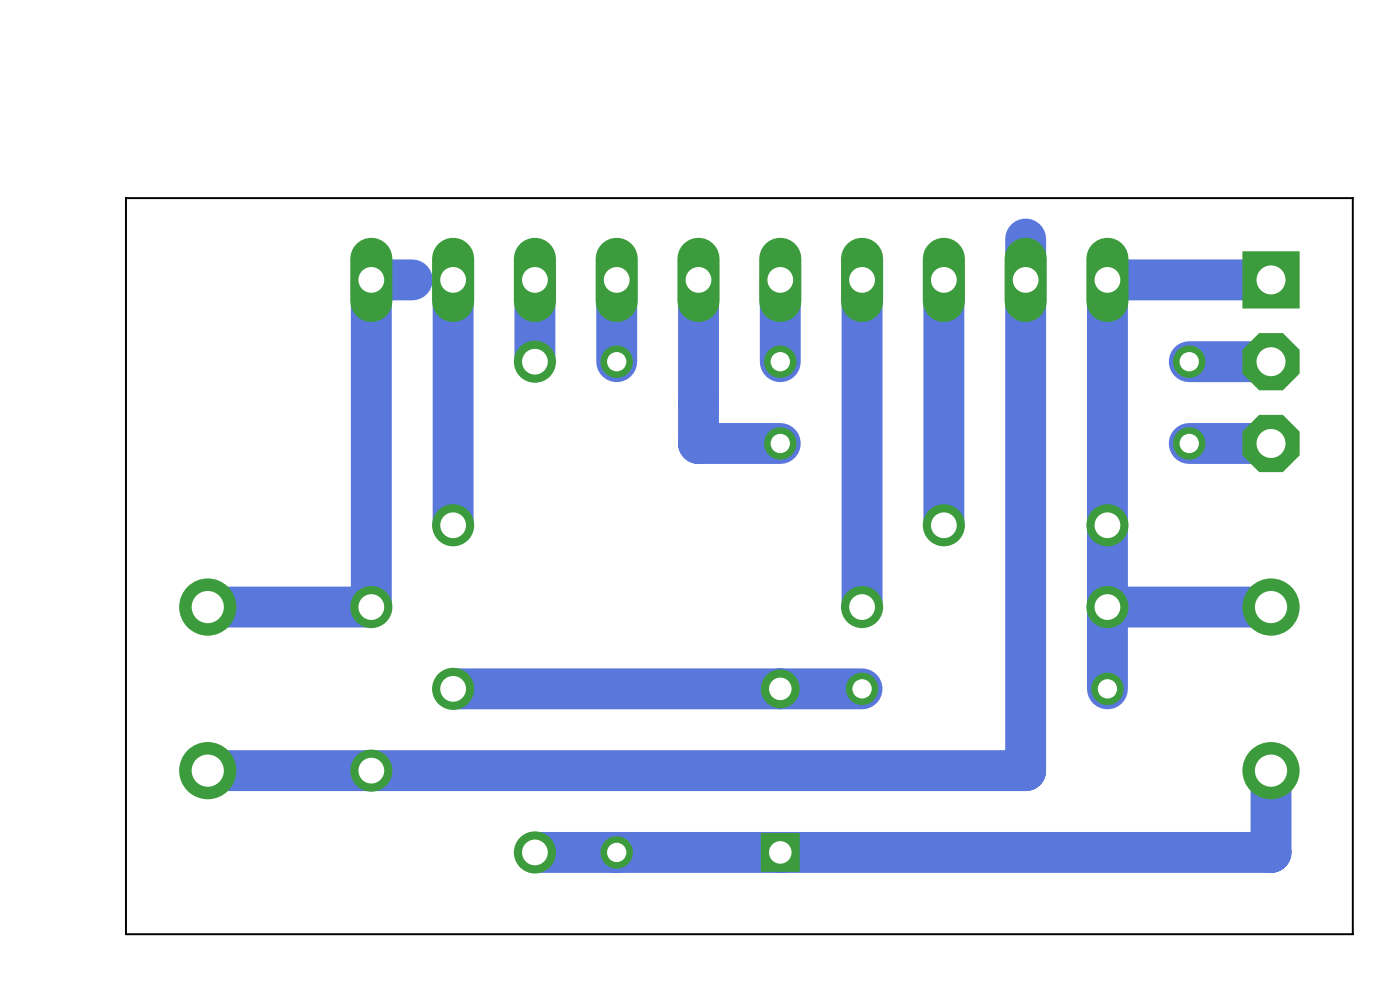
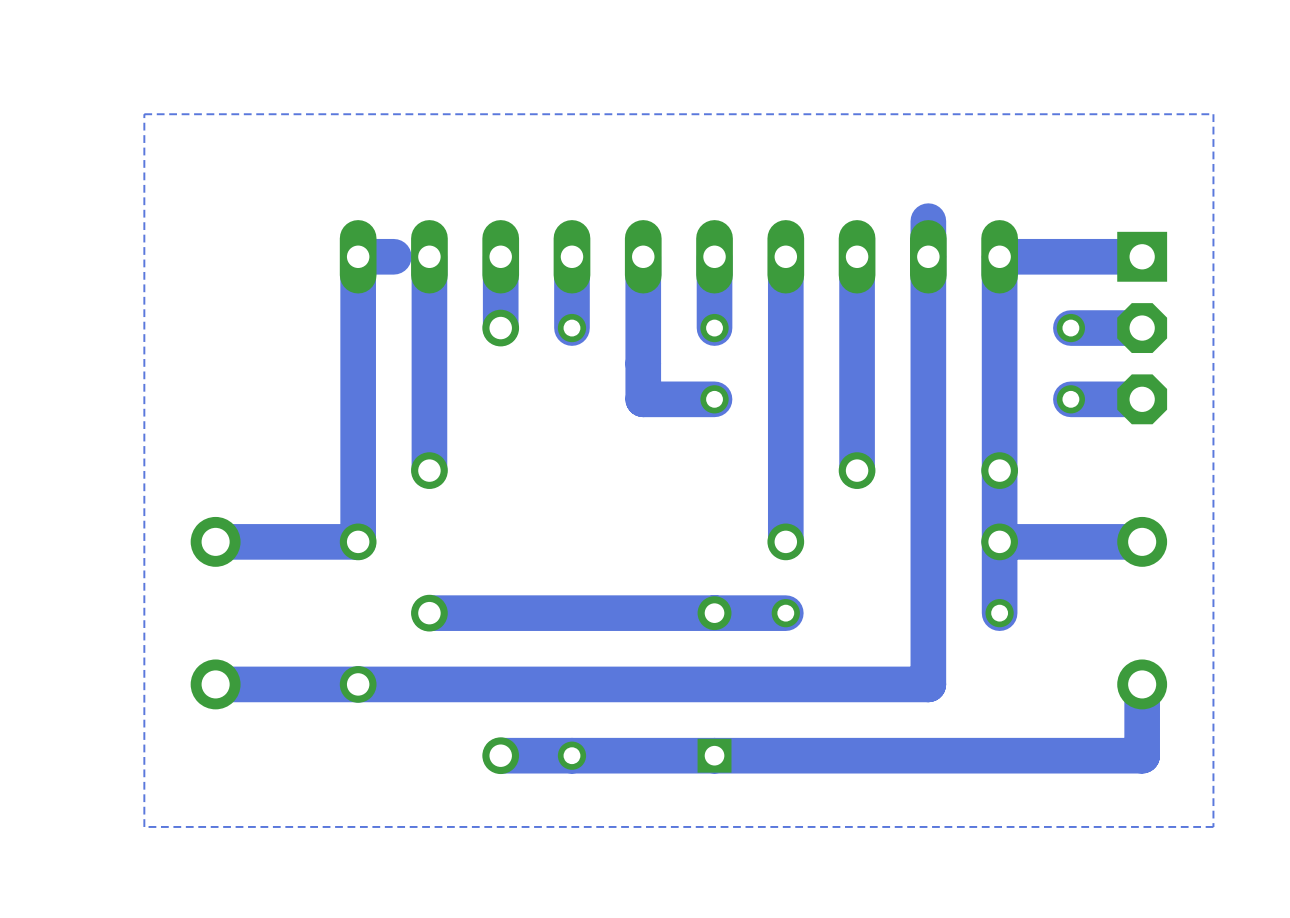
zone outline: none -> (1213, 114) (1213, 826) (144, 826) (144, 114) (1213, 114)
board edge: (1352, 198) (125, 198) (125, 934) (1352, 934) (1352, 198) -> none

